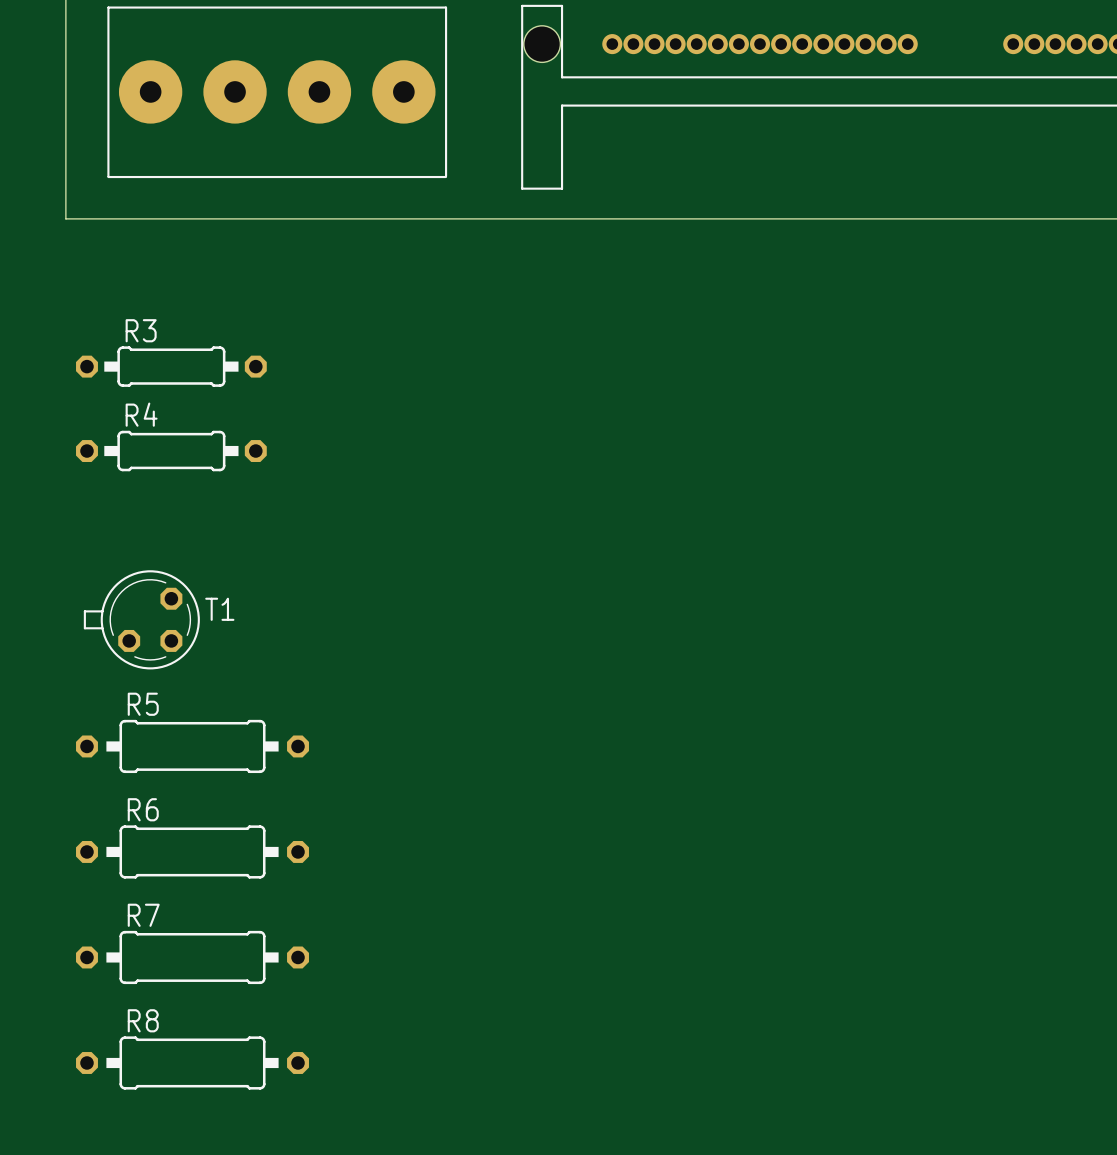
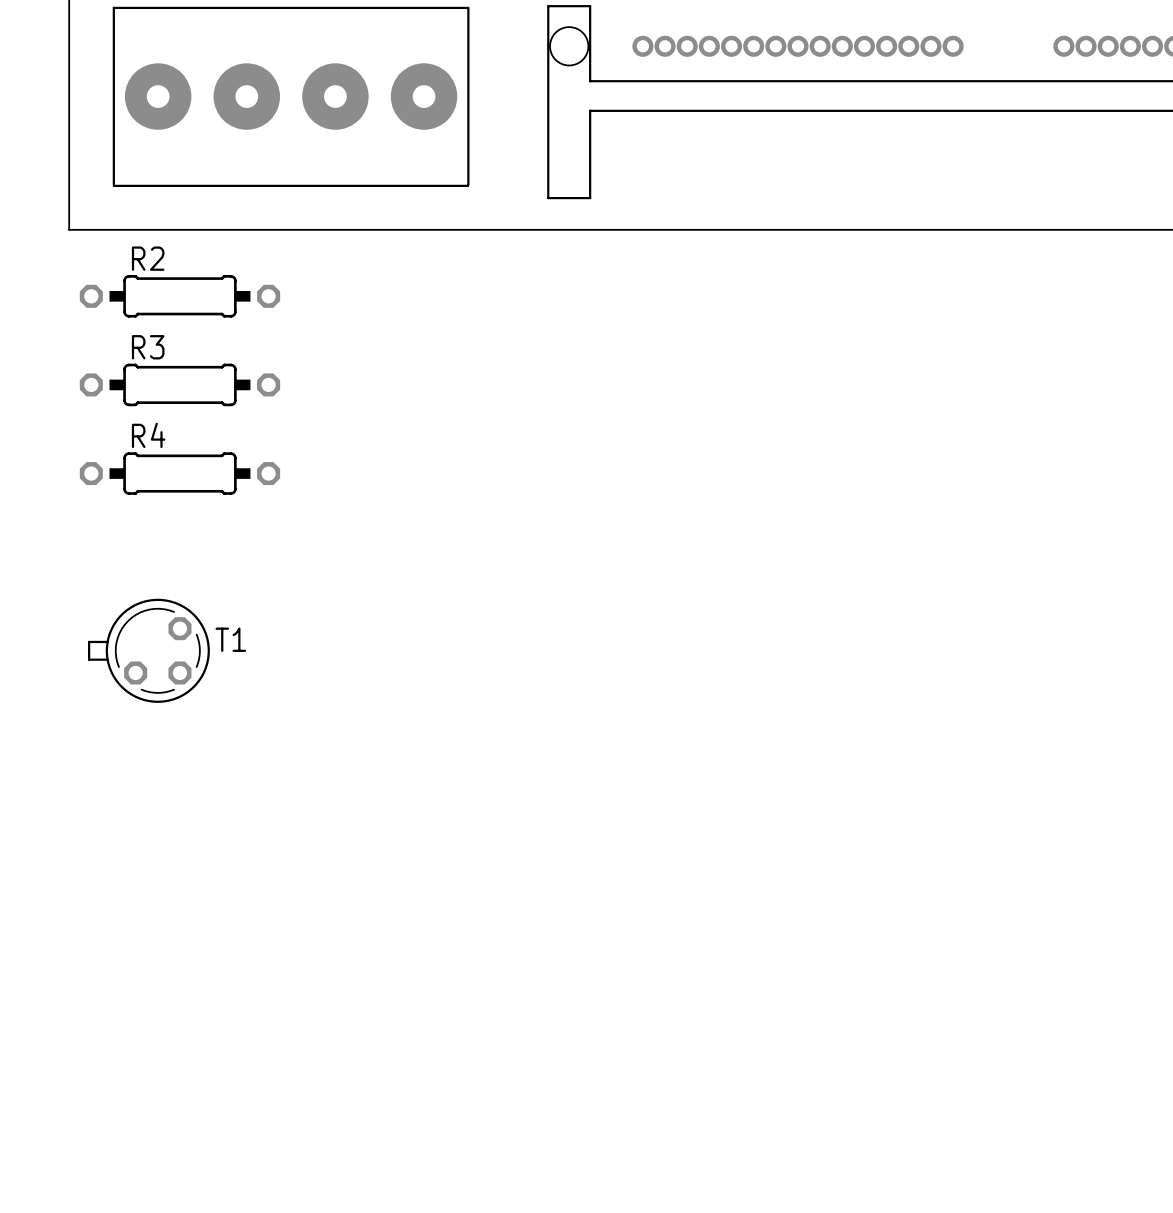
R2: none -> (179, 296)
R5: (192, 746) -> none
R6: (192, 851) -> none
R7: (192, 957) -> none
R8: (192, 1062) -> none

